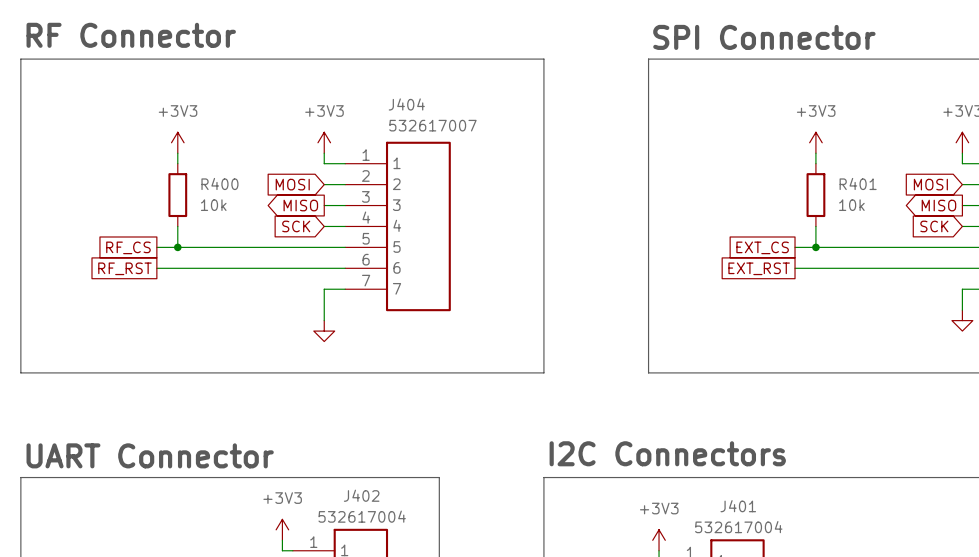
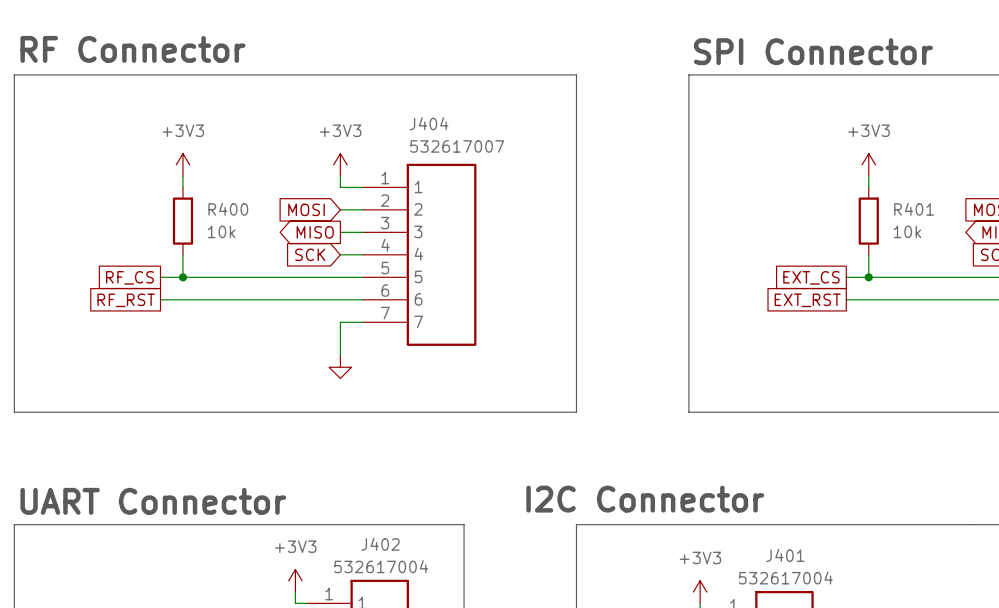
text: I2C Connectors (667, 453) -> I2C Connector (645, 499)

